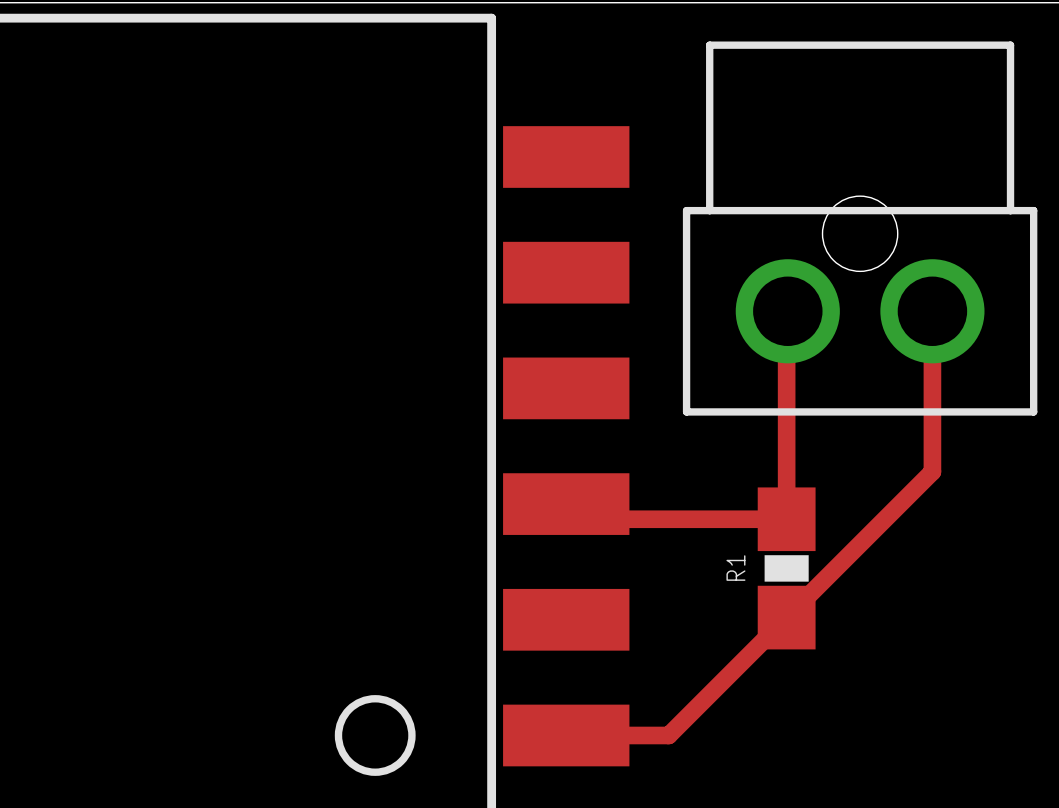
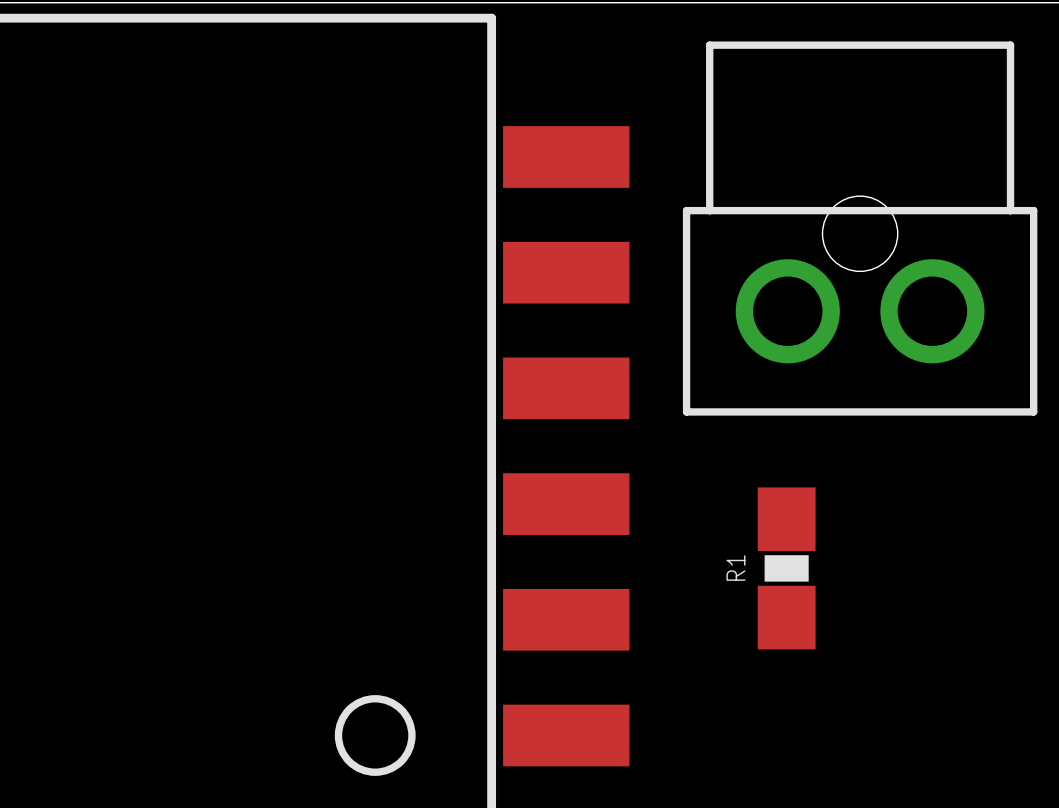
track: (787, 311) (786, 519) (581, 519) (566, 504) -> none
track: (932, 311) (932, 471) (668, 735) (566, 735) -> none

